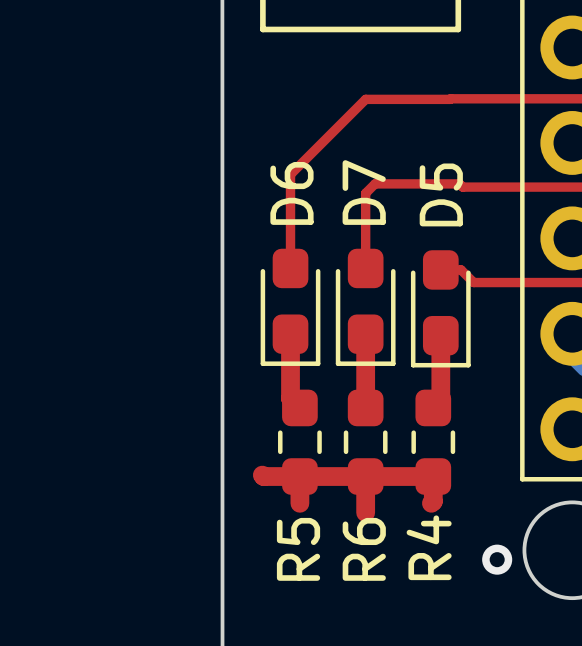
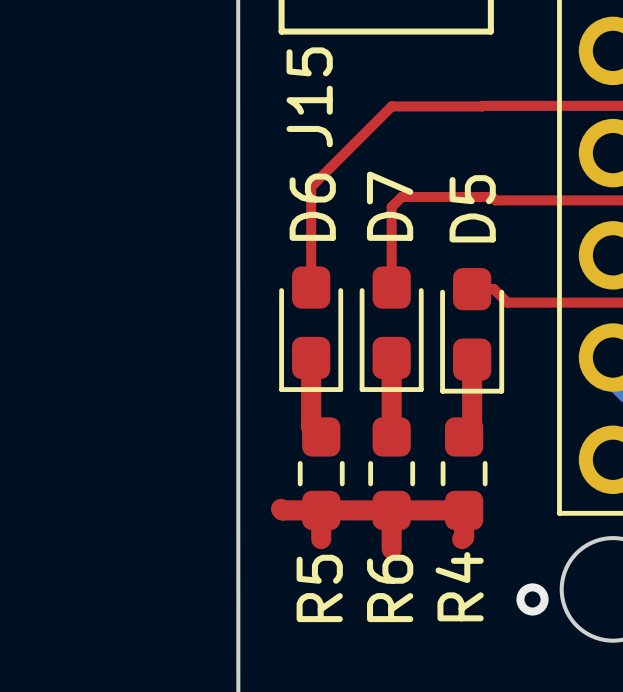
J15 name: none -> J15 (309, 97)

